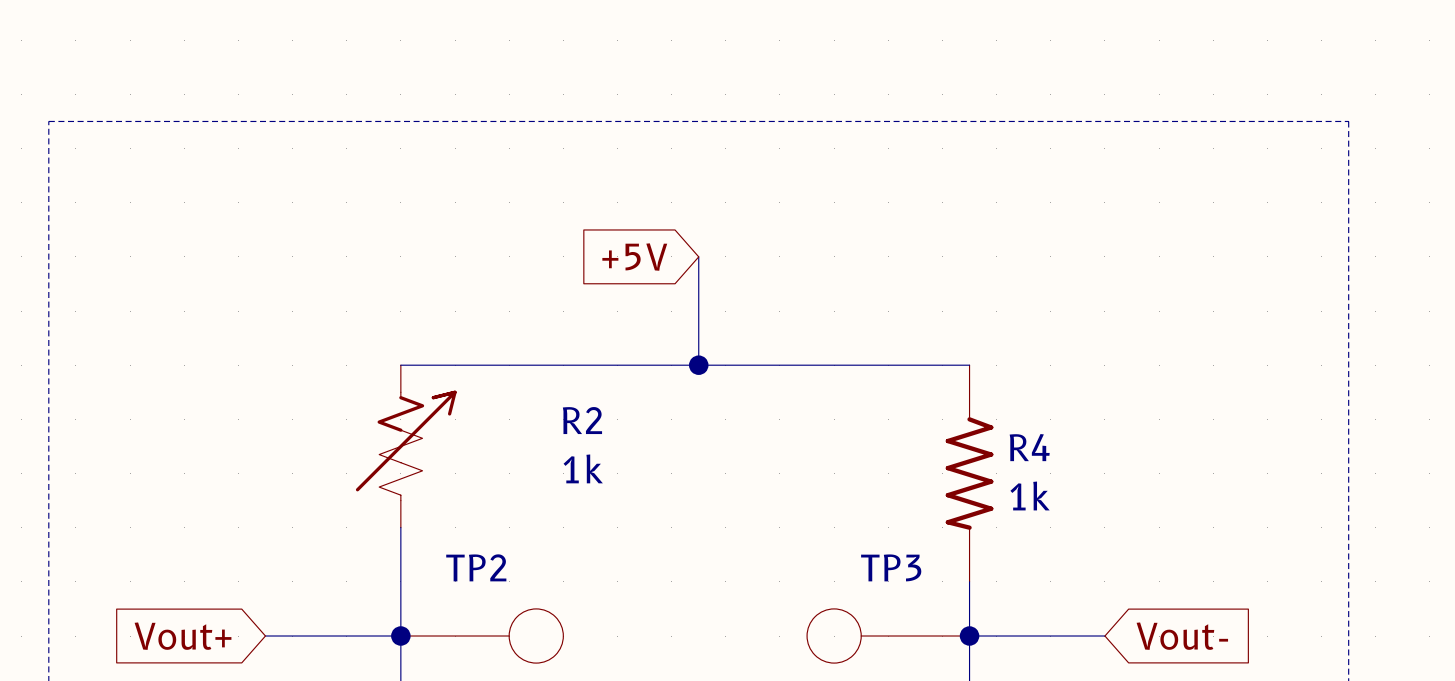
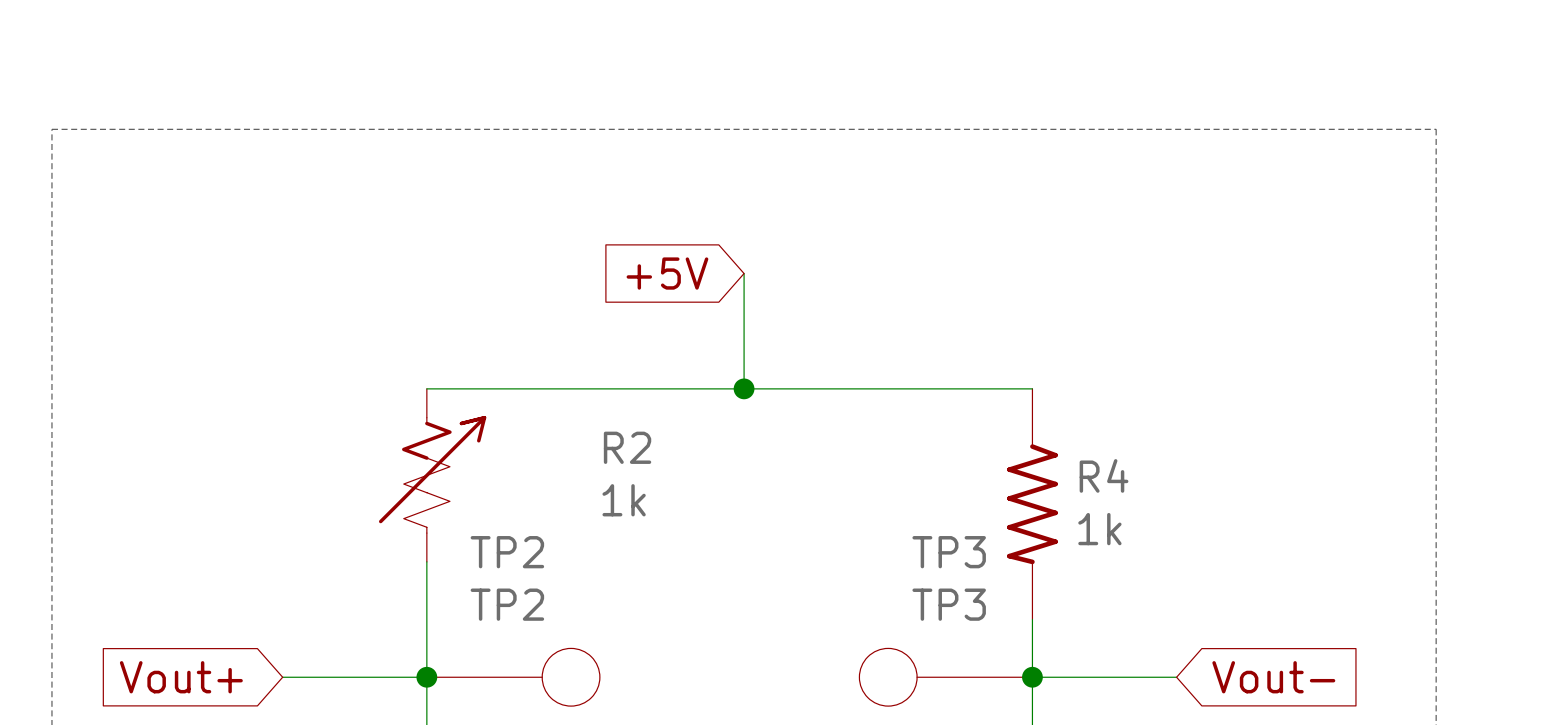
TP2 name: none -> TP2 (507, 552)
TP3 name: none -> TP3 (949, 552)

